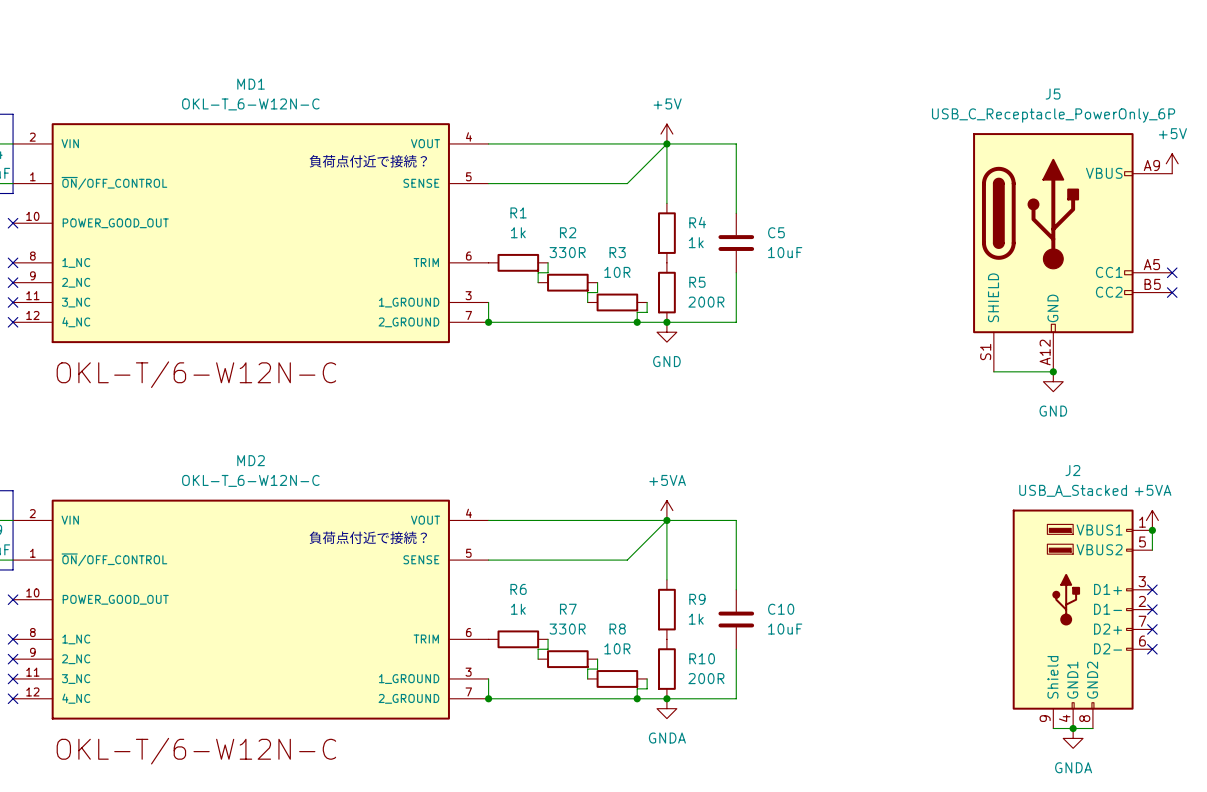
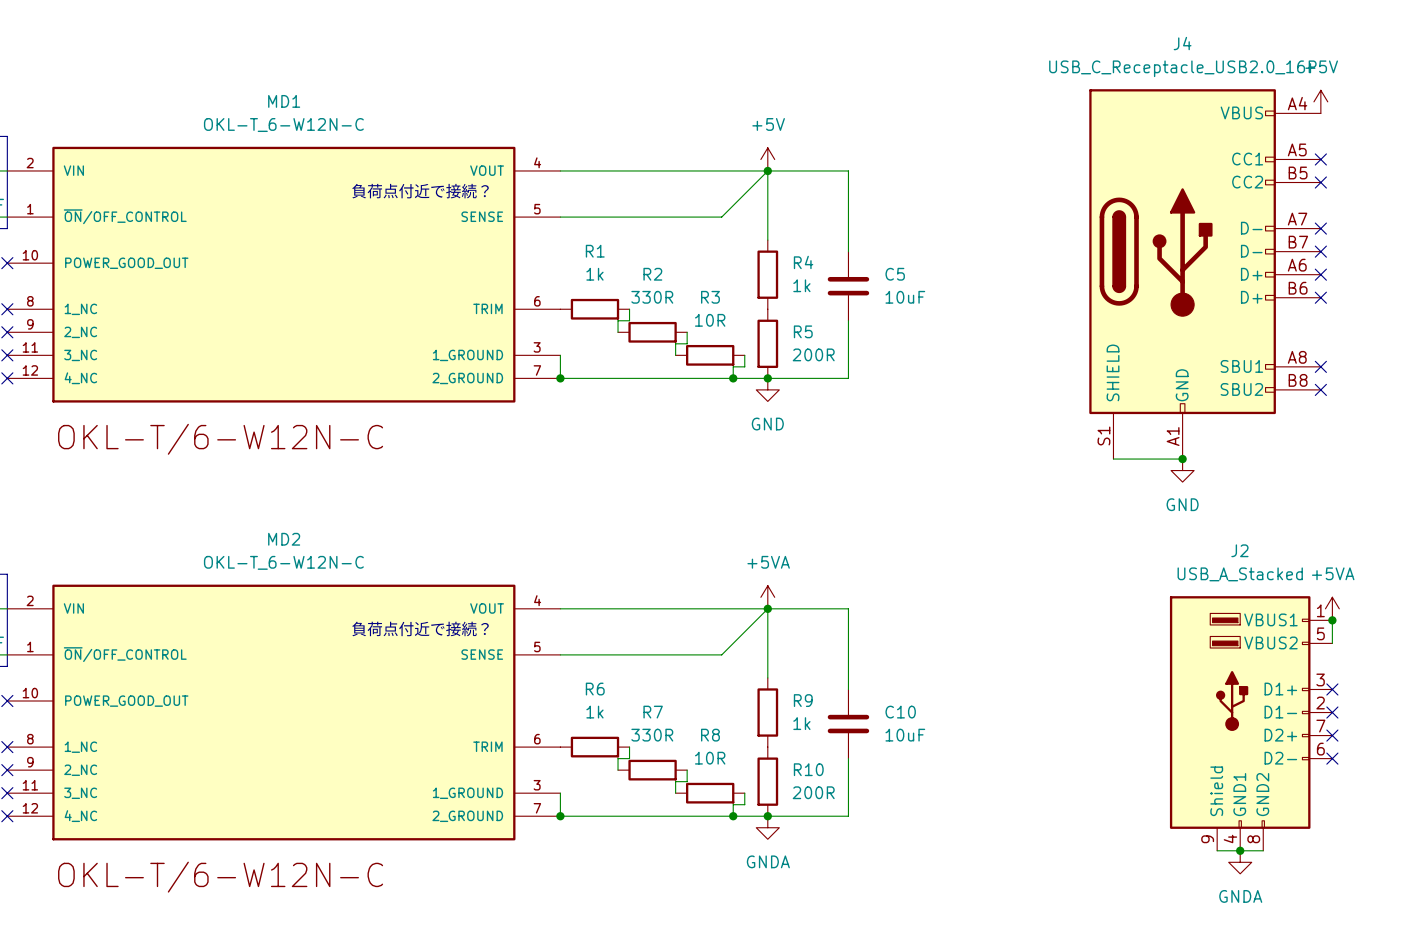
no-connect mark: none -> (1320, 159)
no-connect mark: none -> (1320, 182)
power symbol position: +5V (1172, 163) -> +5V (1320, 101)
no-connect mark: none -> (1320, 228)
no-connect mark: none -> (1320, 251)
J4: none -> USB_C_Receptacle_USB2.0_16P (1205, 274)
no-connect mark: none -> (1320, 274)
J5: USB_C_Receptacle_PowerOnly_6P (1072, 252) -> none
no-connect mark: none -> (1320, 297)
no-connect mark: (1172, 272) -> none
no-connect mark: (1172, 292) -> none
no-connect mark: none -> (1320, 366)
no-connect mark: none -> (1320, 389)
wire: (993, 371) (1053, 371) -> (1113, 459) (1182, 459)
junction position: (1053, 371) -> (1182, 459)
power symbol position: GND (1053, 381) -> GND (1182, 470)

